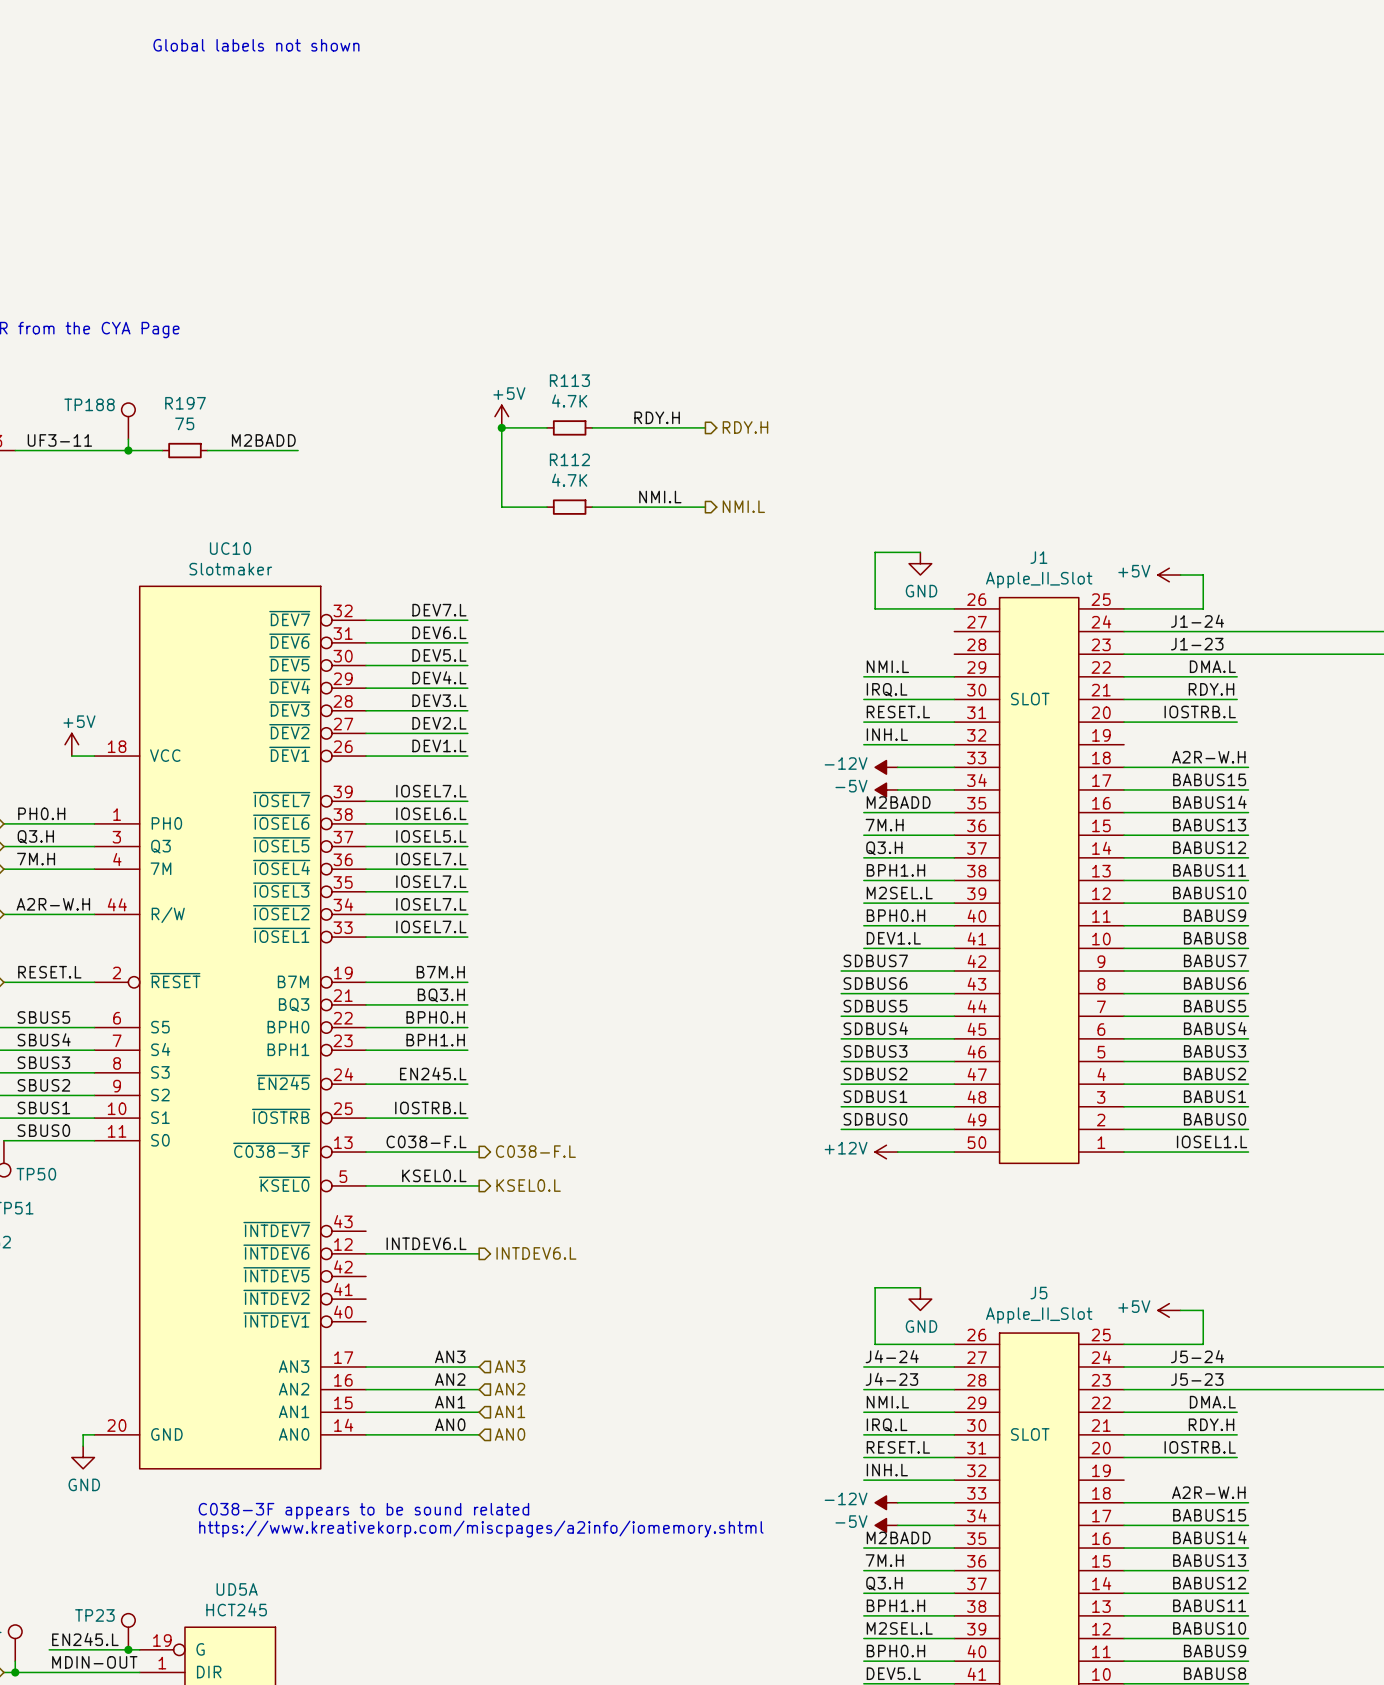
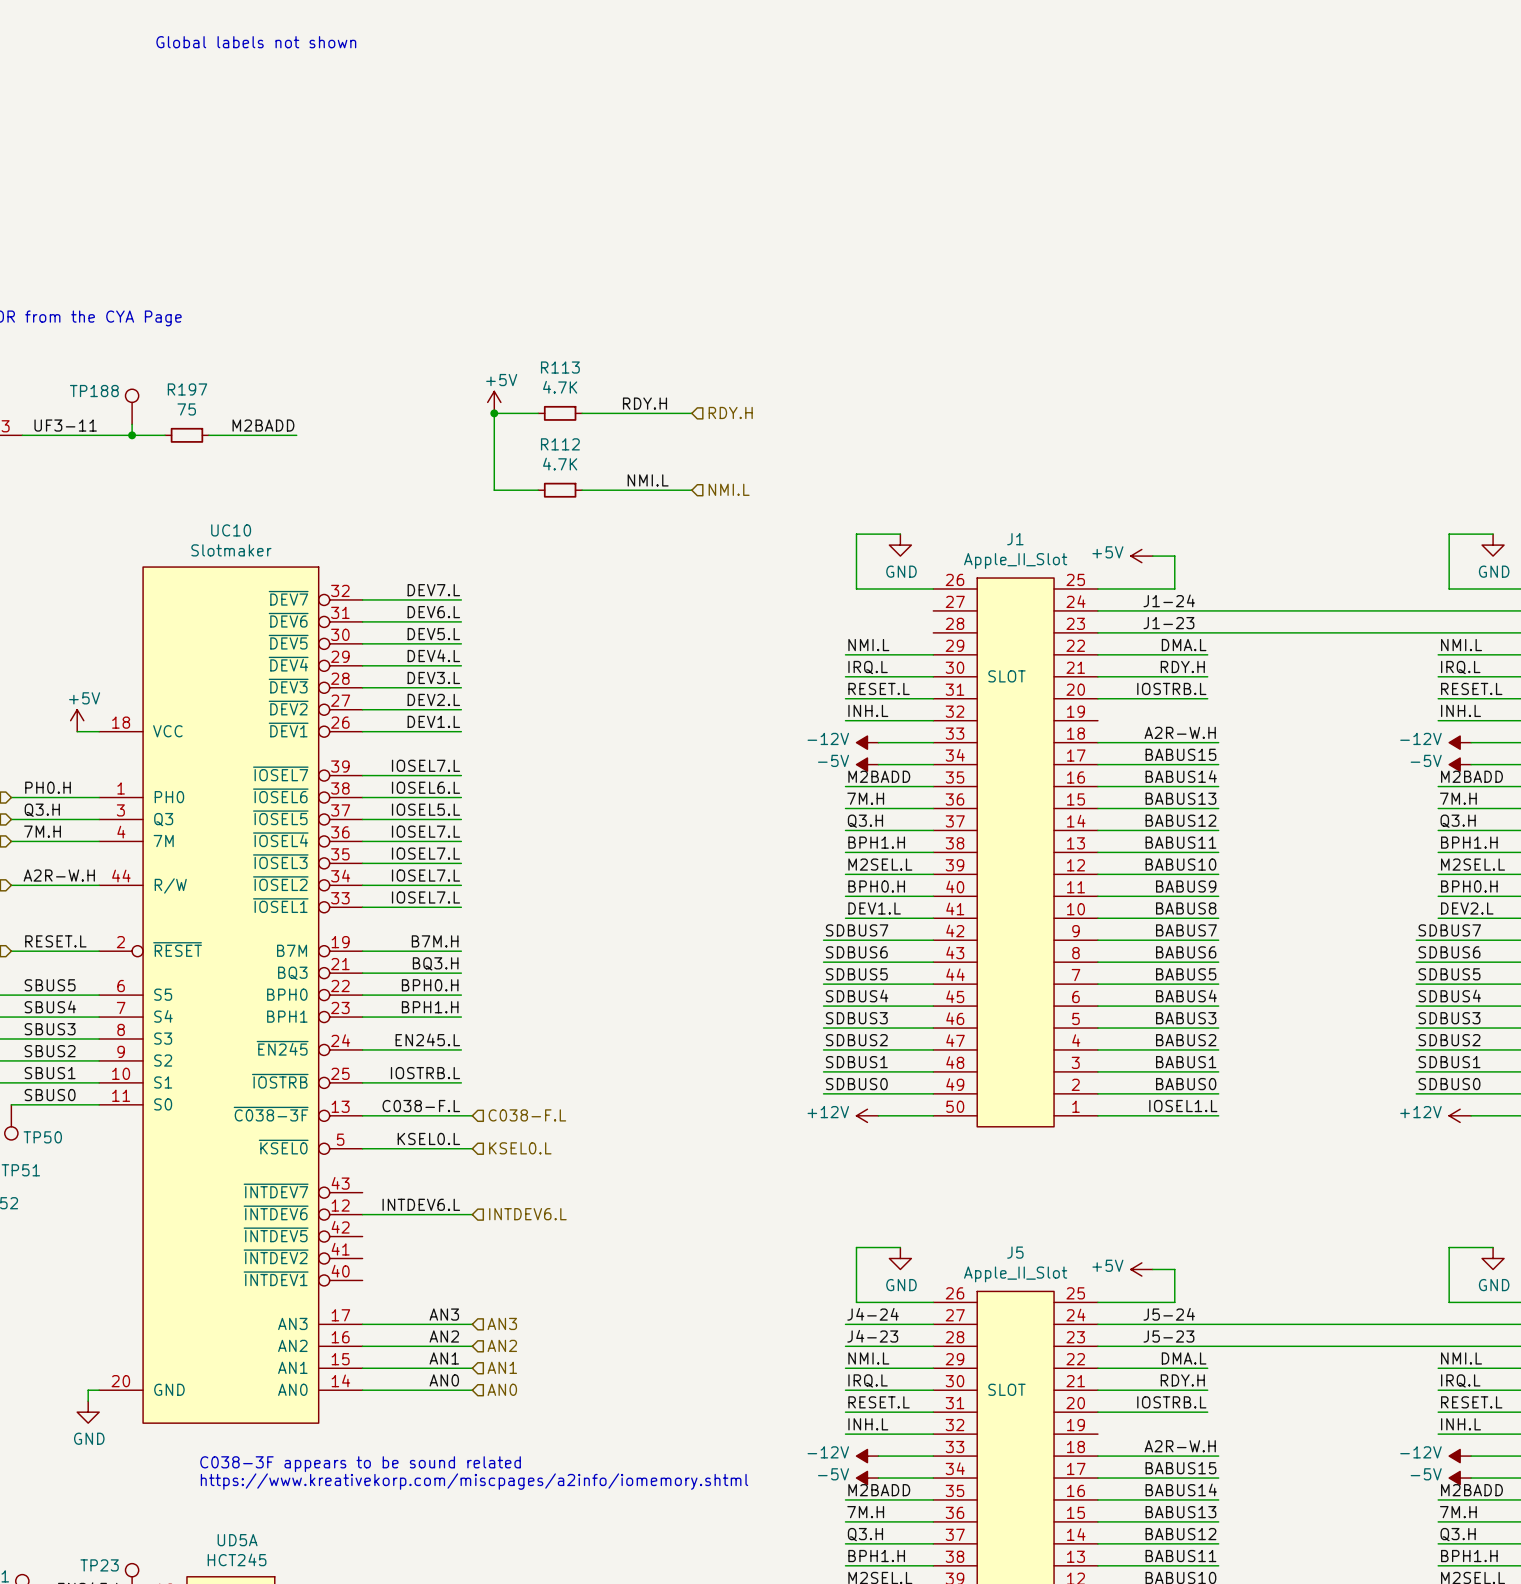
hierarchical label shape: output (745, 427) -> input (730, 412)
hierarchical label shape: output (743, 506) -> input (729, 489)
hierarchical label shape: output (535, 1151) -> input (527, 1115)
hierarchical label shape: output (528, 1185) -> input (520, 1148)
hierarchical label shape: output (536, 1253) -> input (527, 1214)

